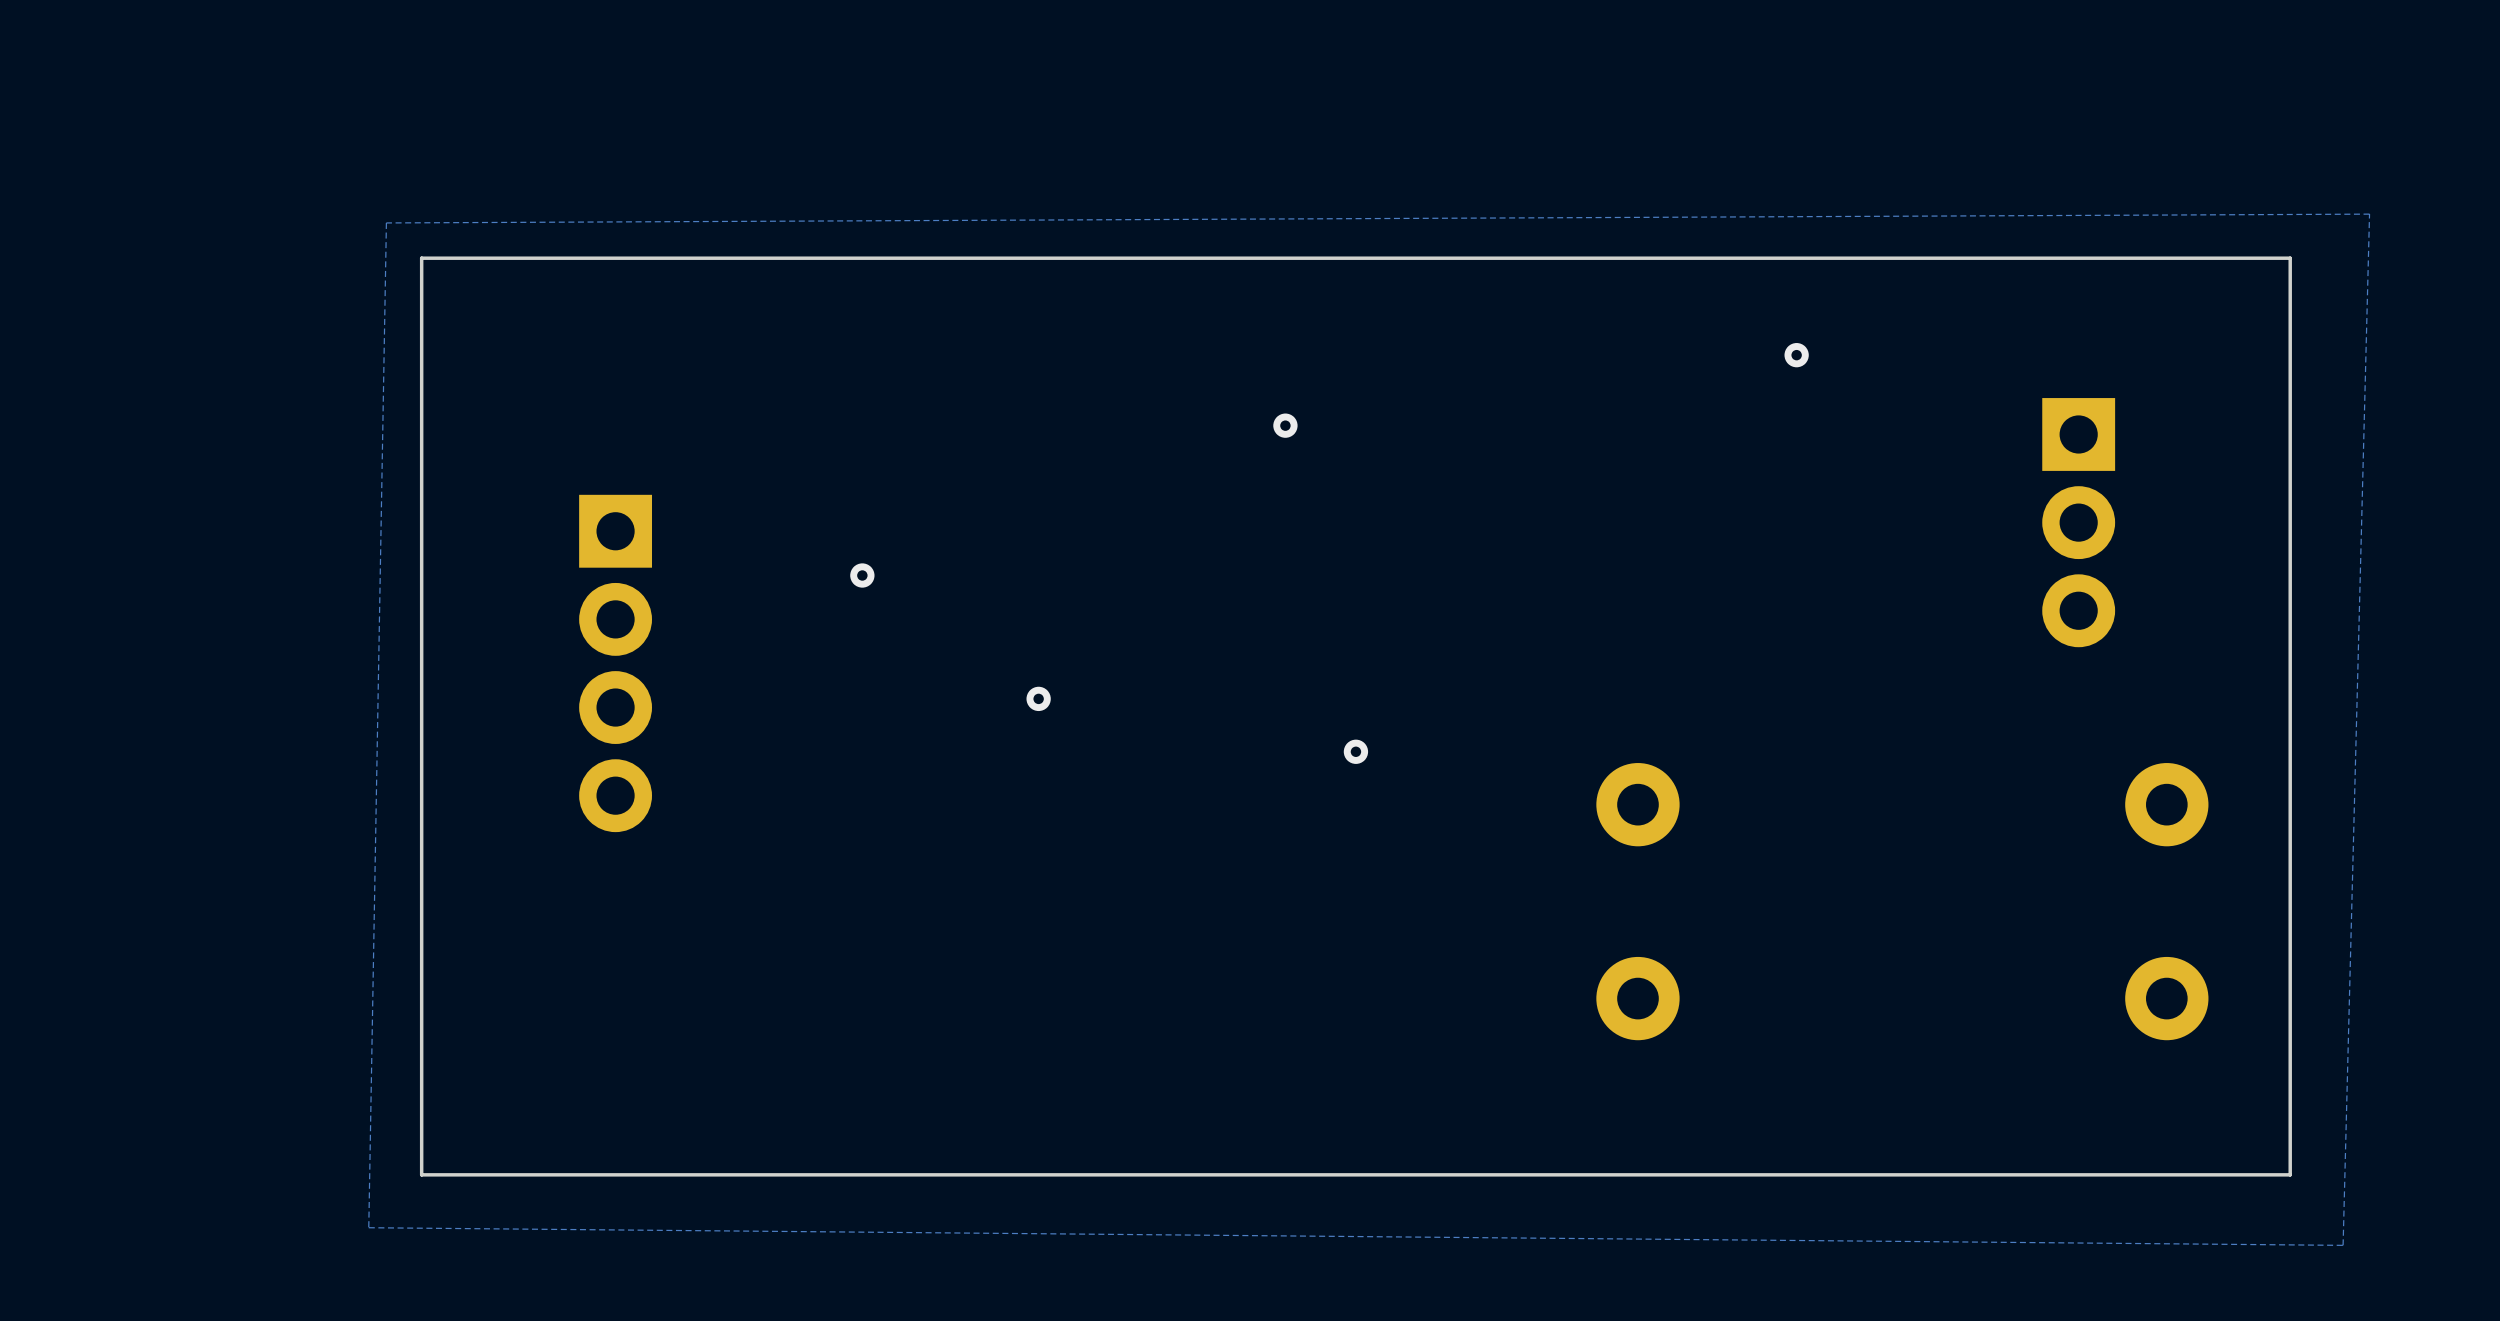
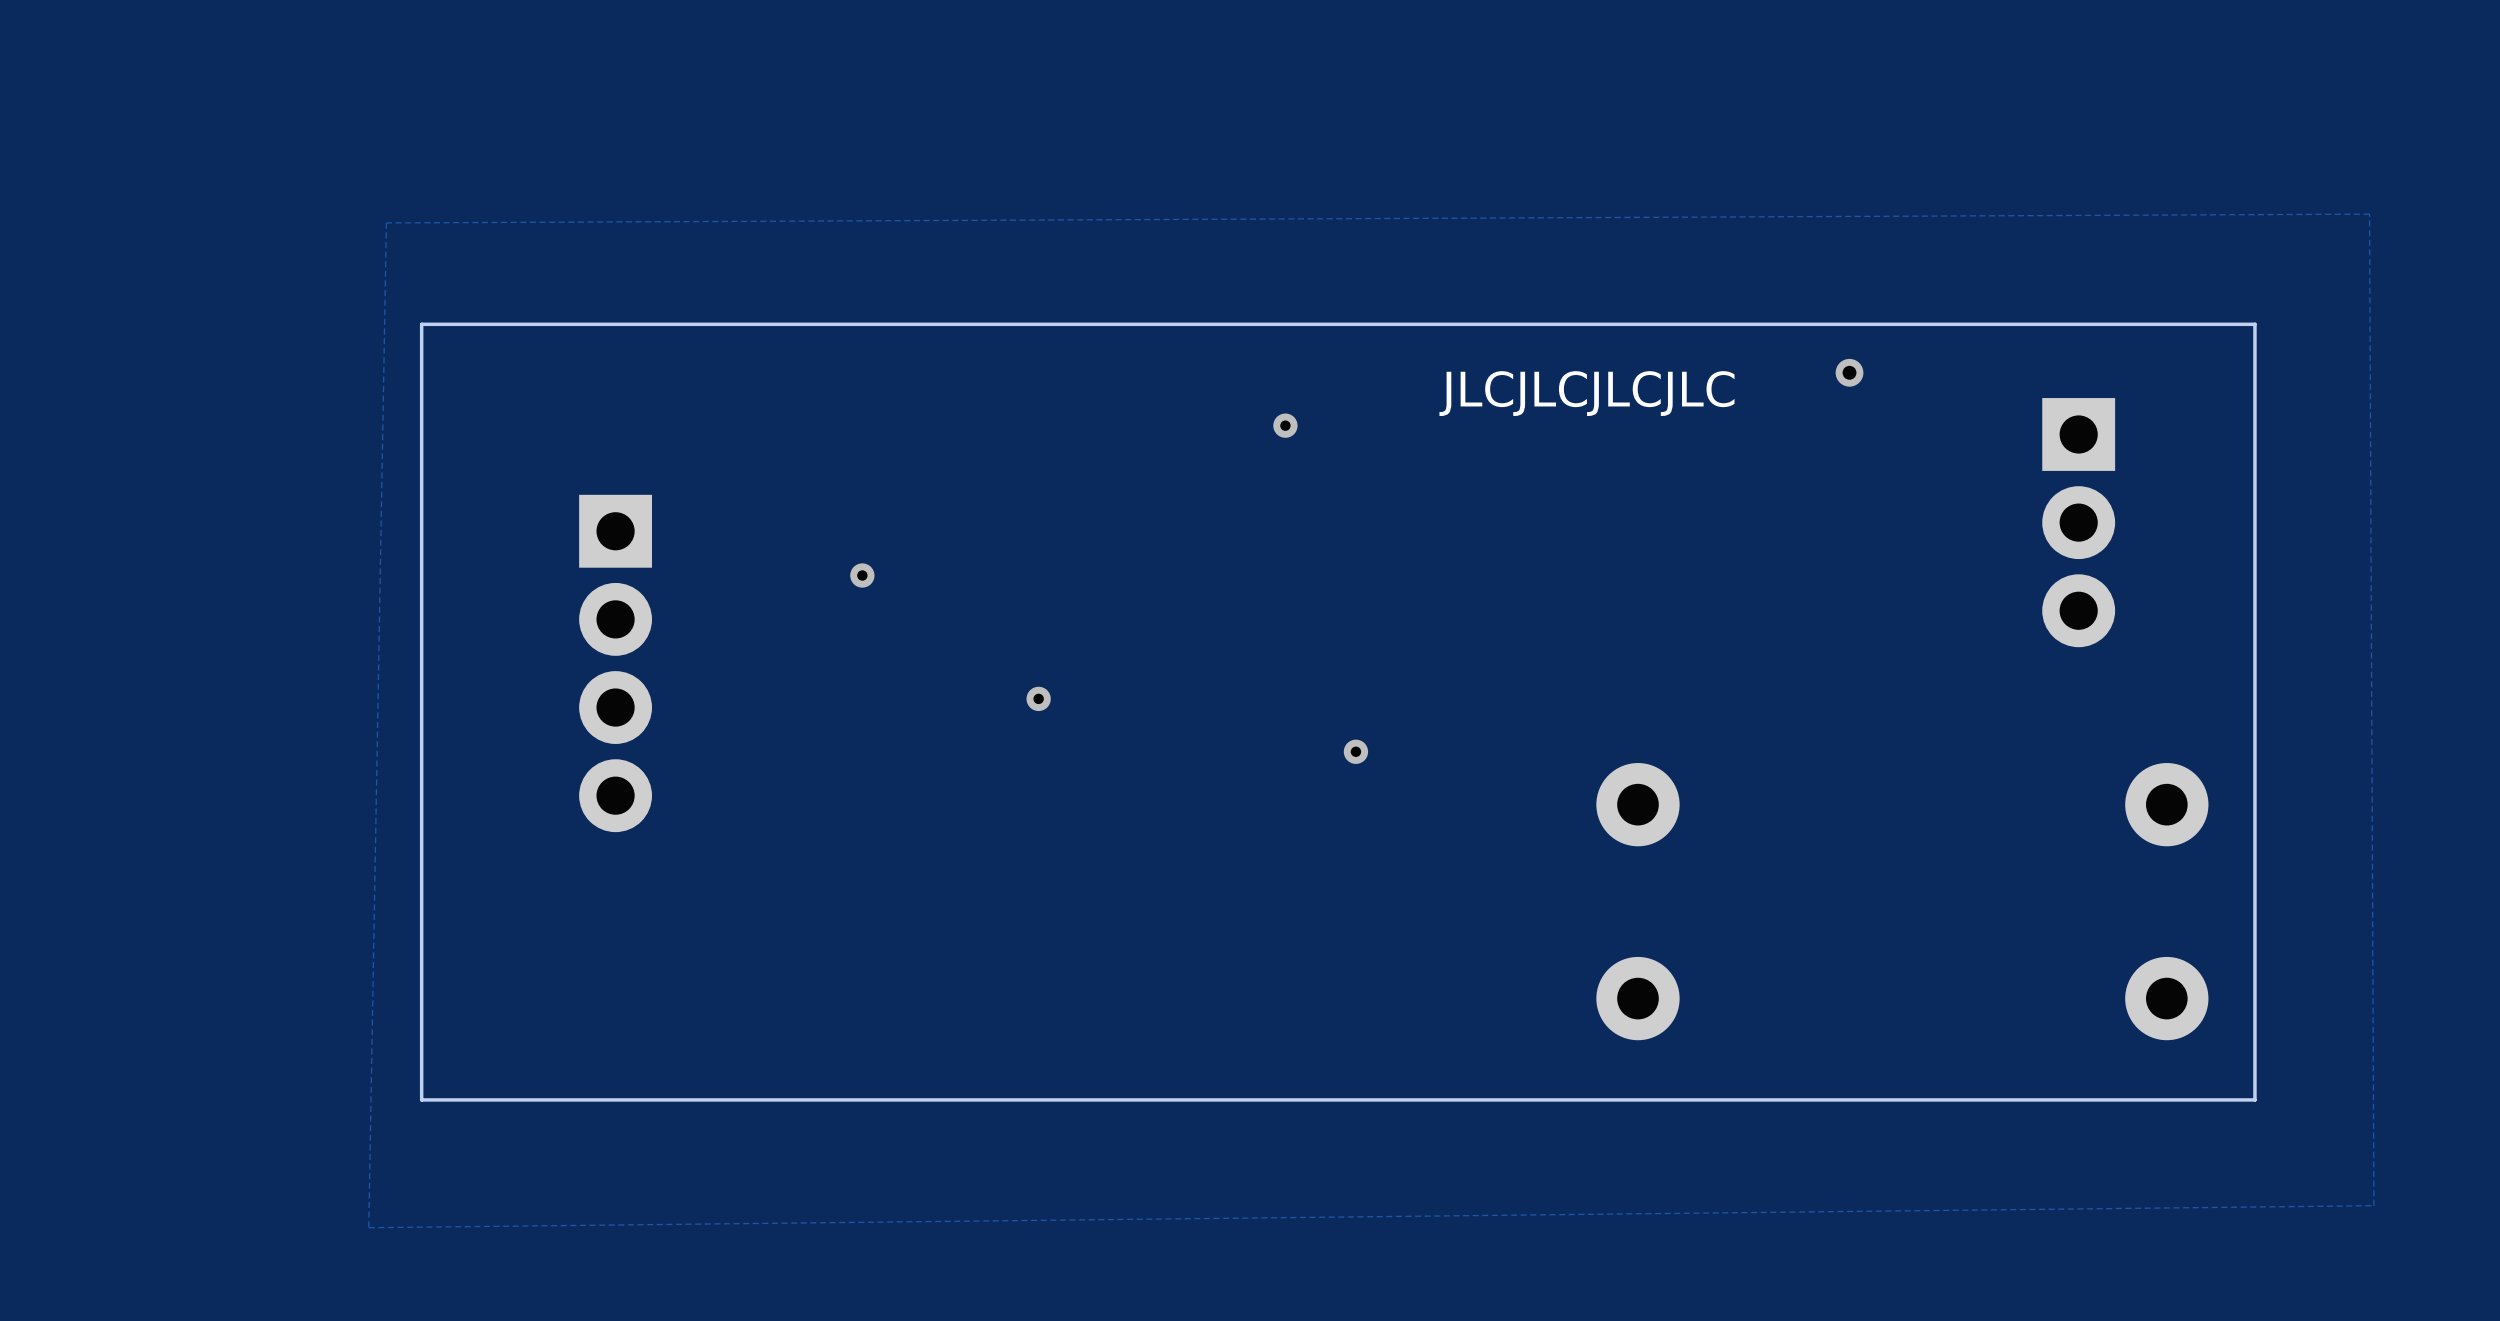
zone outline: (2369, 214) (2343, 1245) (368, 1227) -> (2369, 214) (2373, 1205) (368, 1227)
board edge: (421, 324) (421, 258) (2290, 258) (2290, 1174) (421, 1174) (421, 1099) -> (421, 324) (2254, 324) (2254, 1099) (421, 1099)
via: (1796, 355) -> none
via: none -> (1849, 372)
text: none -> JLCJLCJLCJLC (1586, 393)

